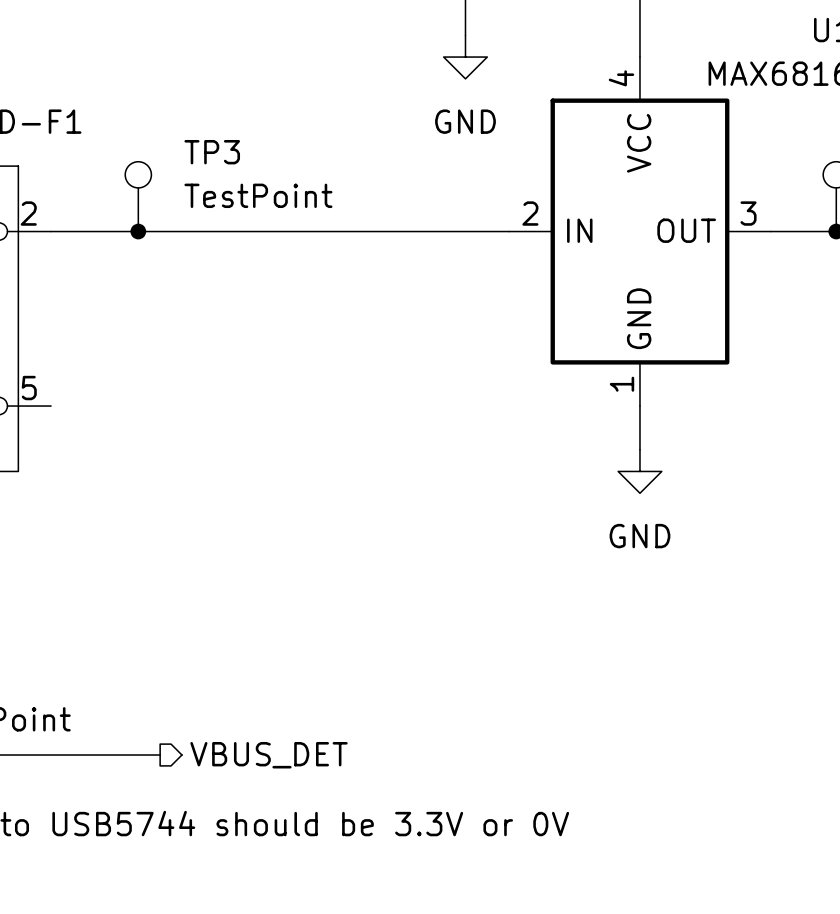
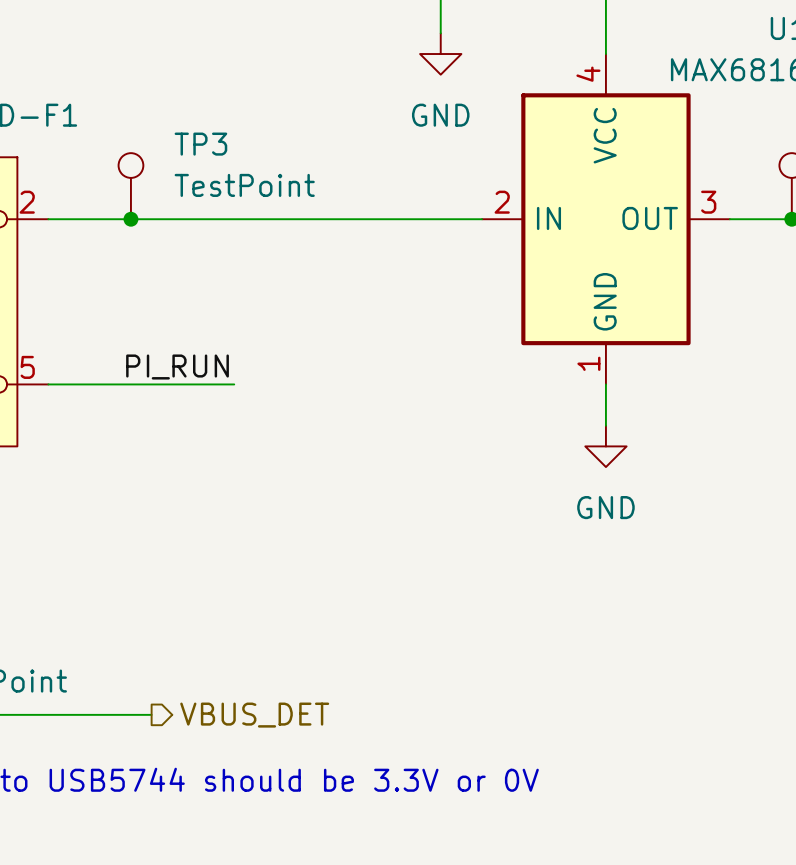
label: none -> PI_RUN (177, 366)
wire: none -> (48, 384) (234, 384)

